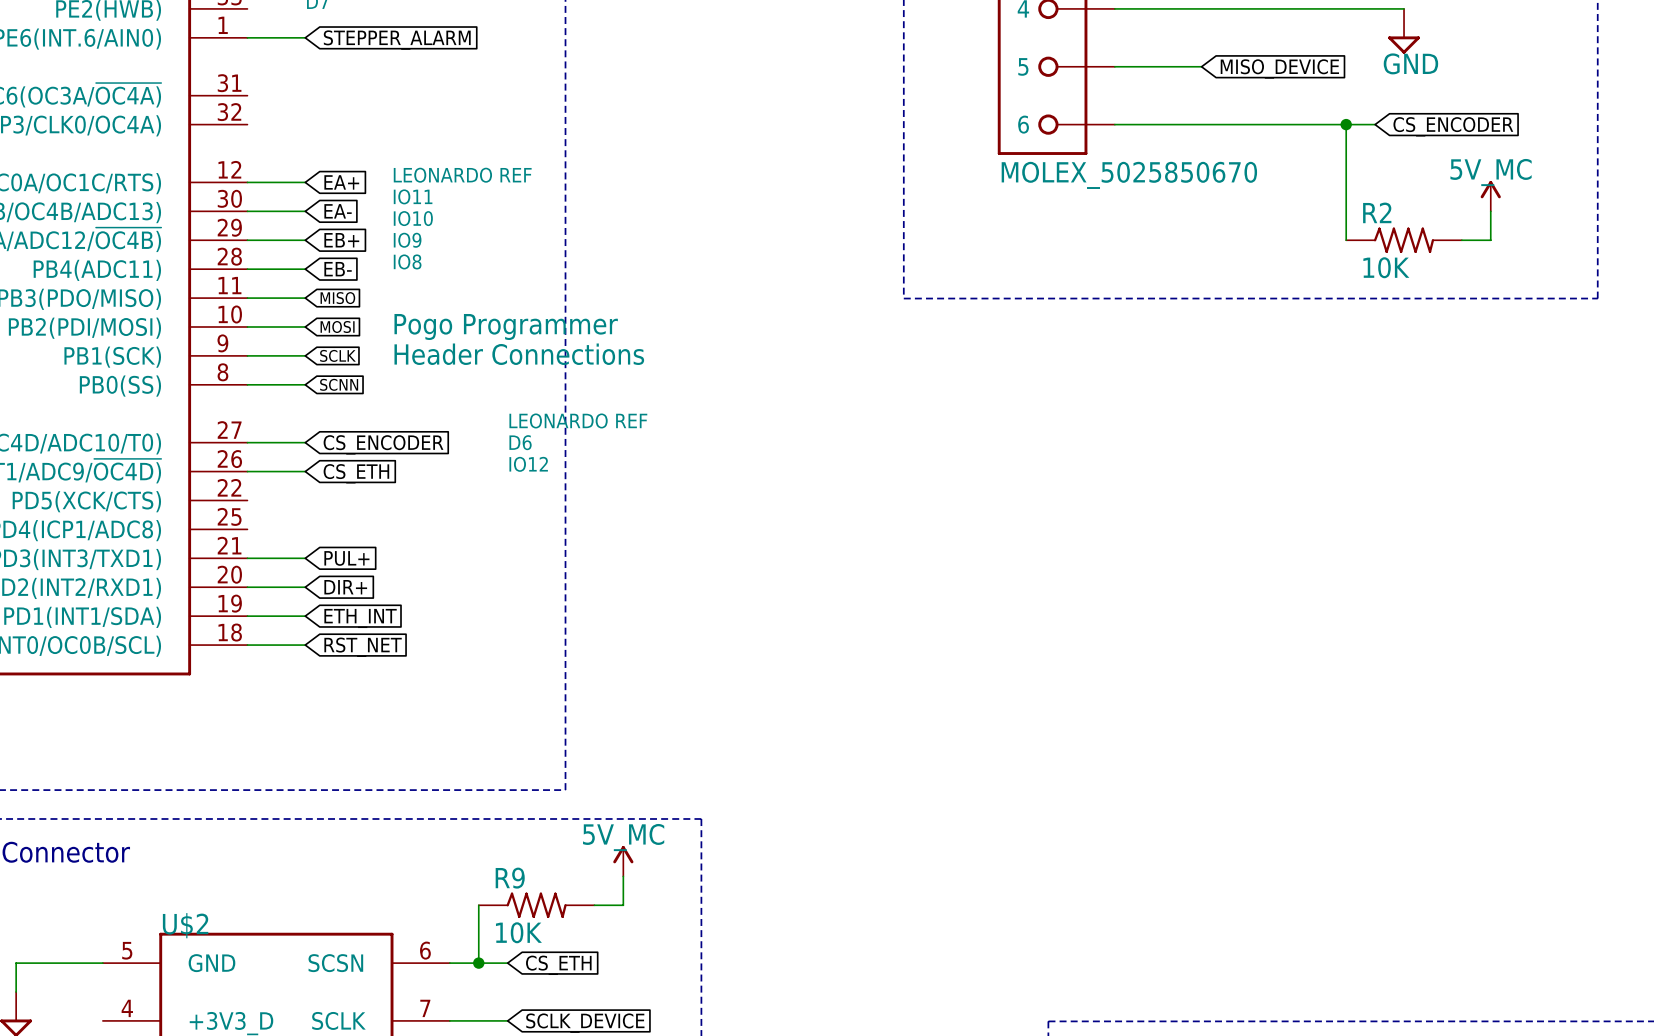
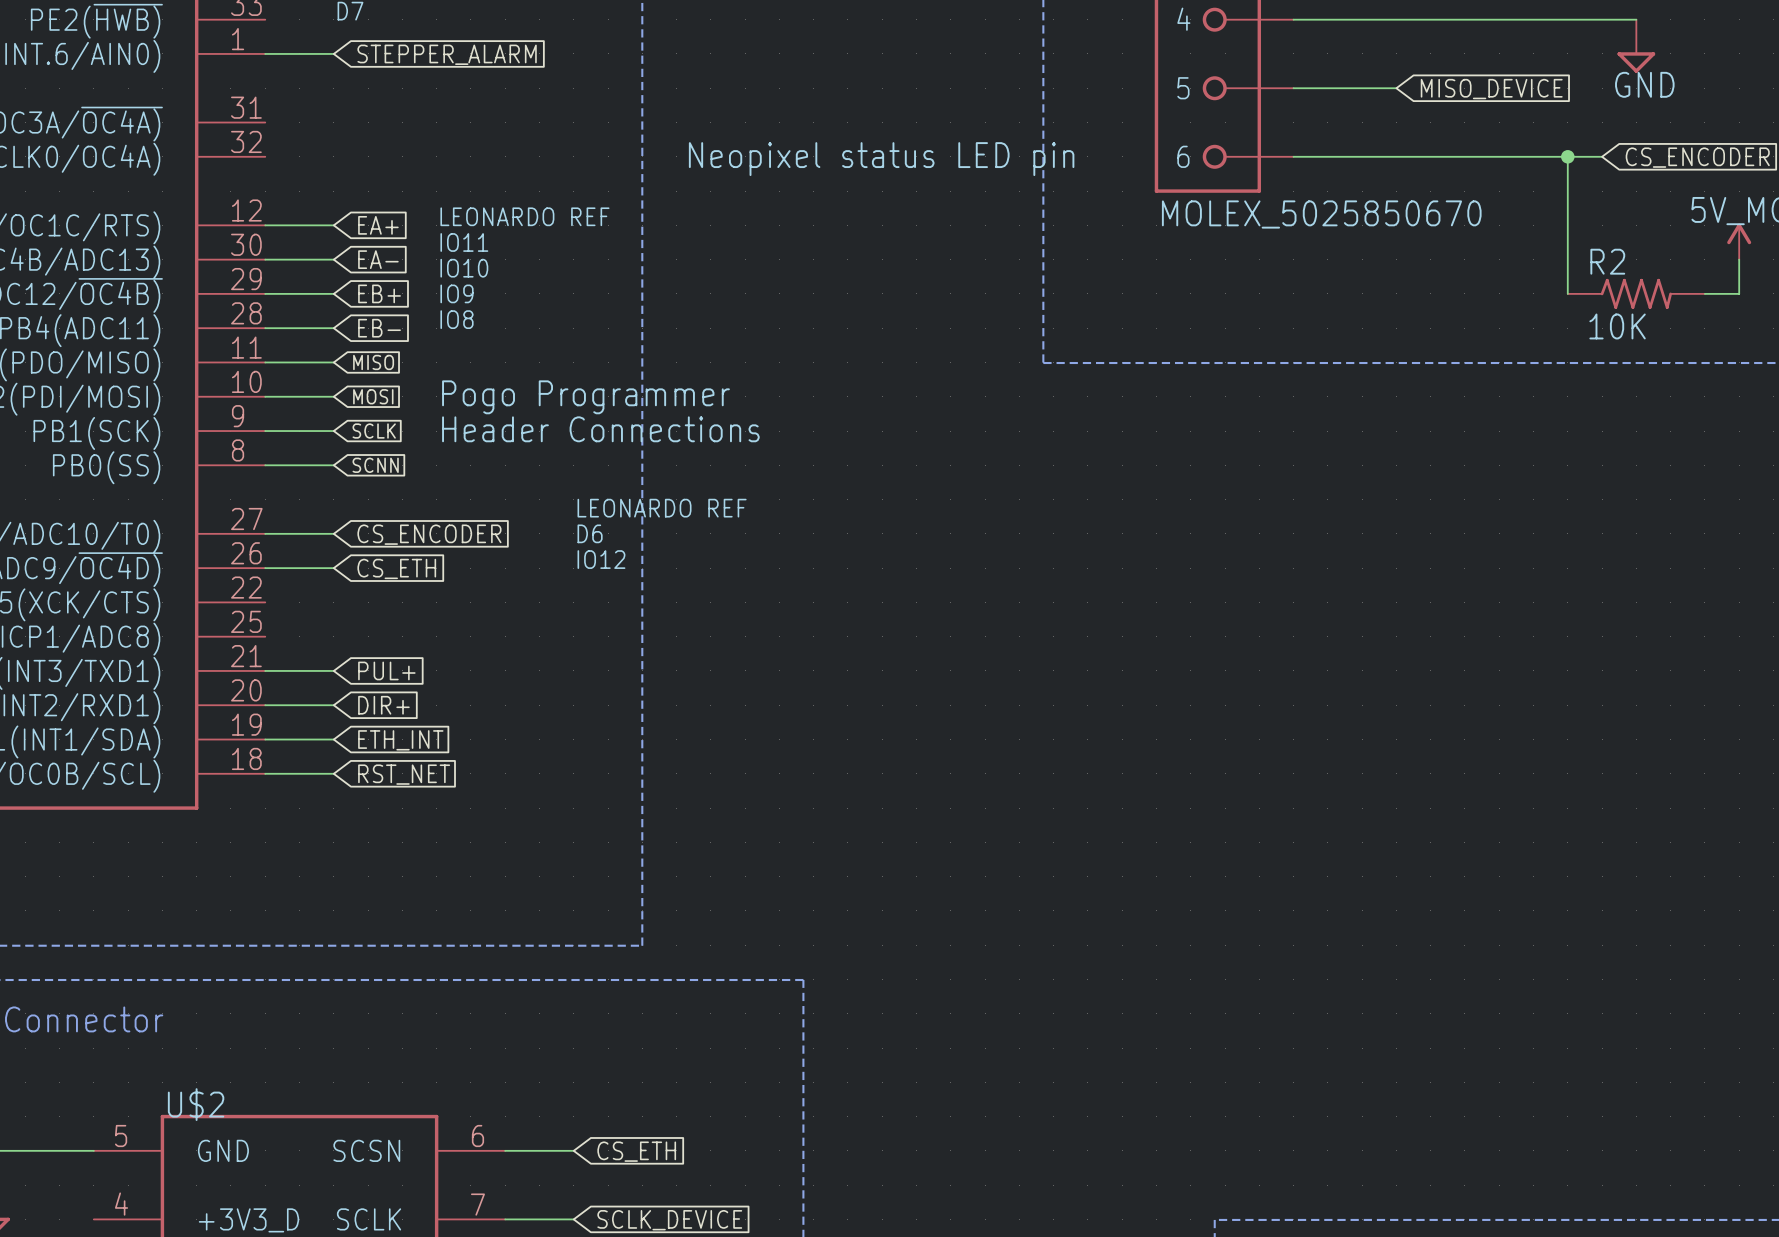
text: none -> Neopixel status LED pin (881, 159)
power symbol: 5V_MC (623, 861) -> none
wire: (623, 876) (623, 905) (594, 905) -> none
wire: (478, 905) (478, 963) -> none
R9: 10K (536, 905) -> none
junction: (478, 963) -> none

